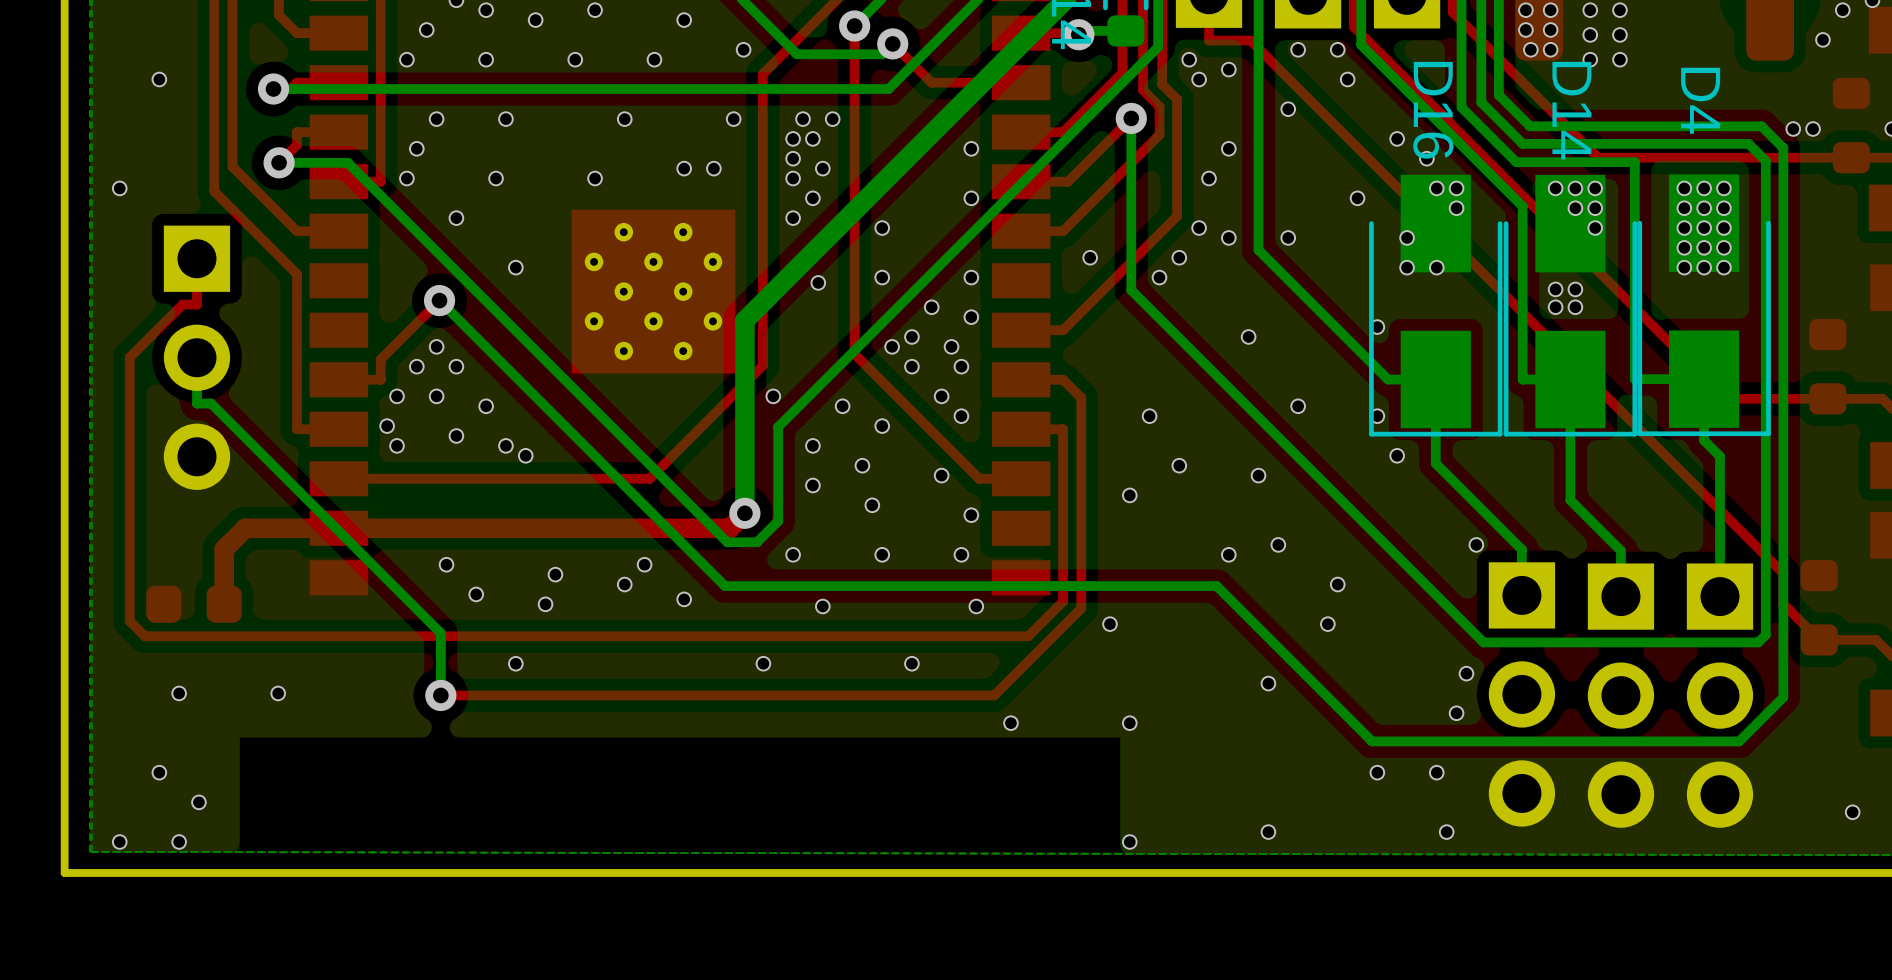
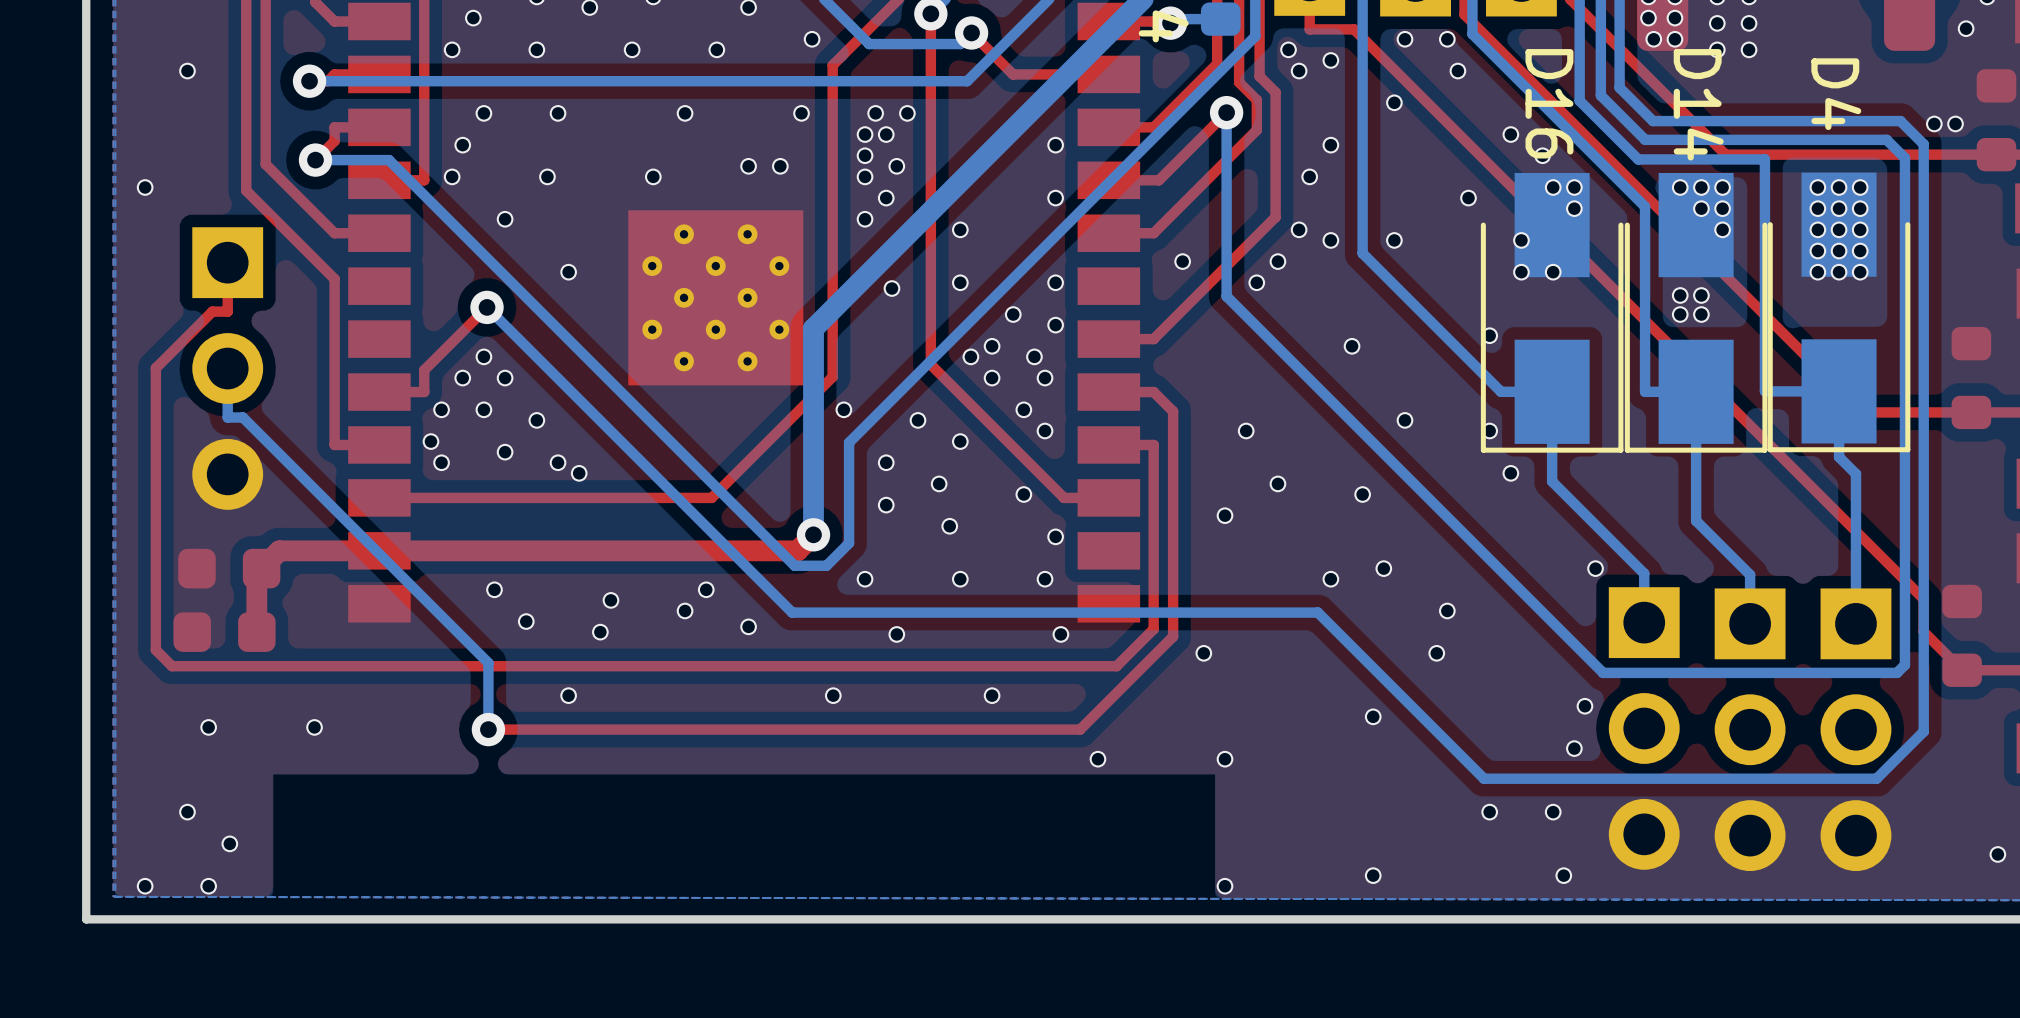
part: none -> (229, 568)

